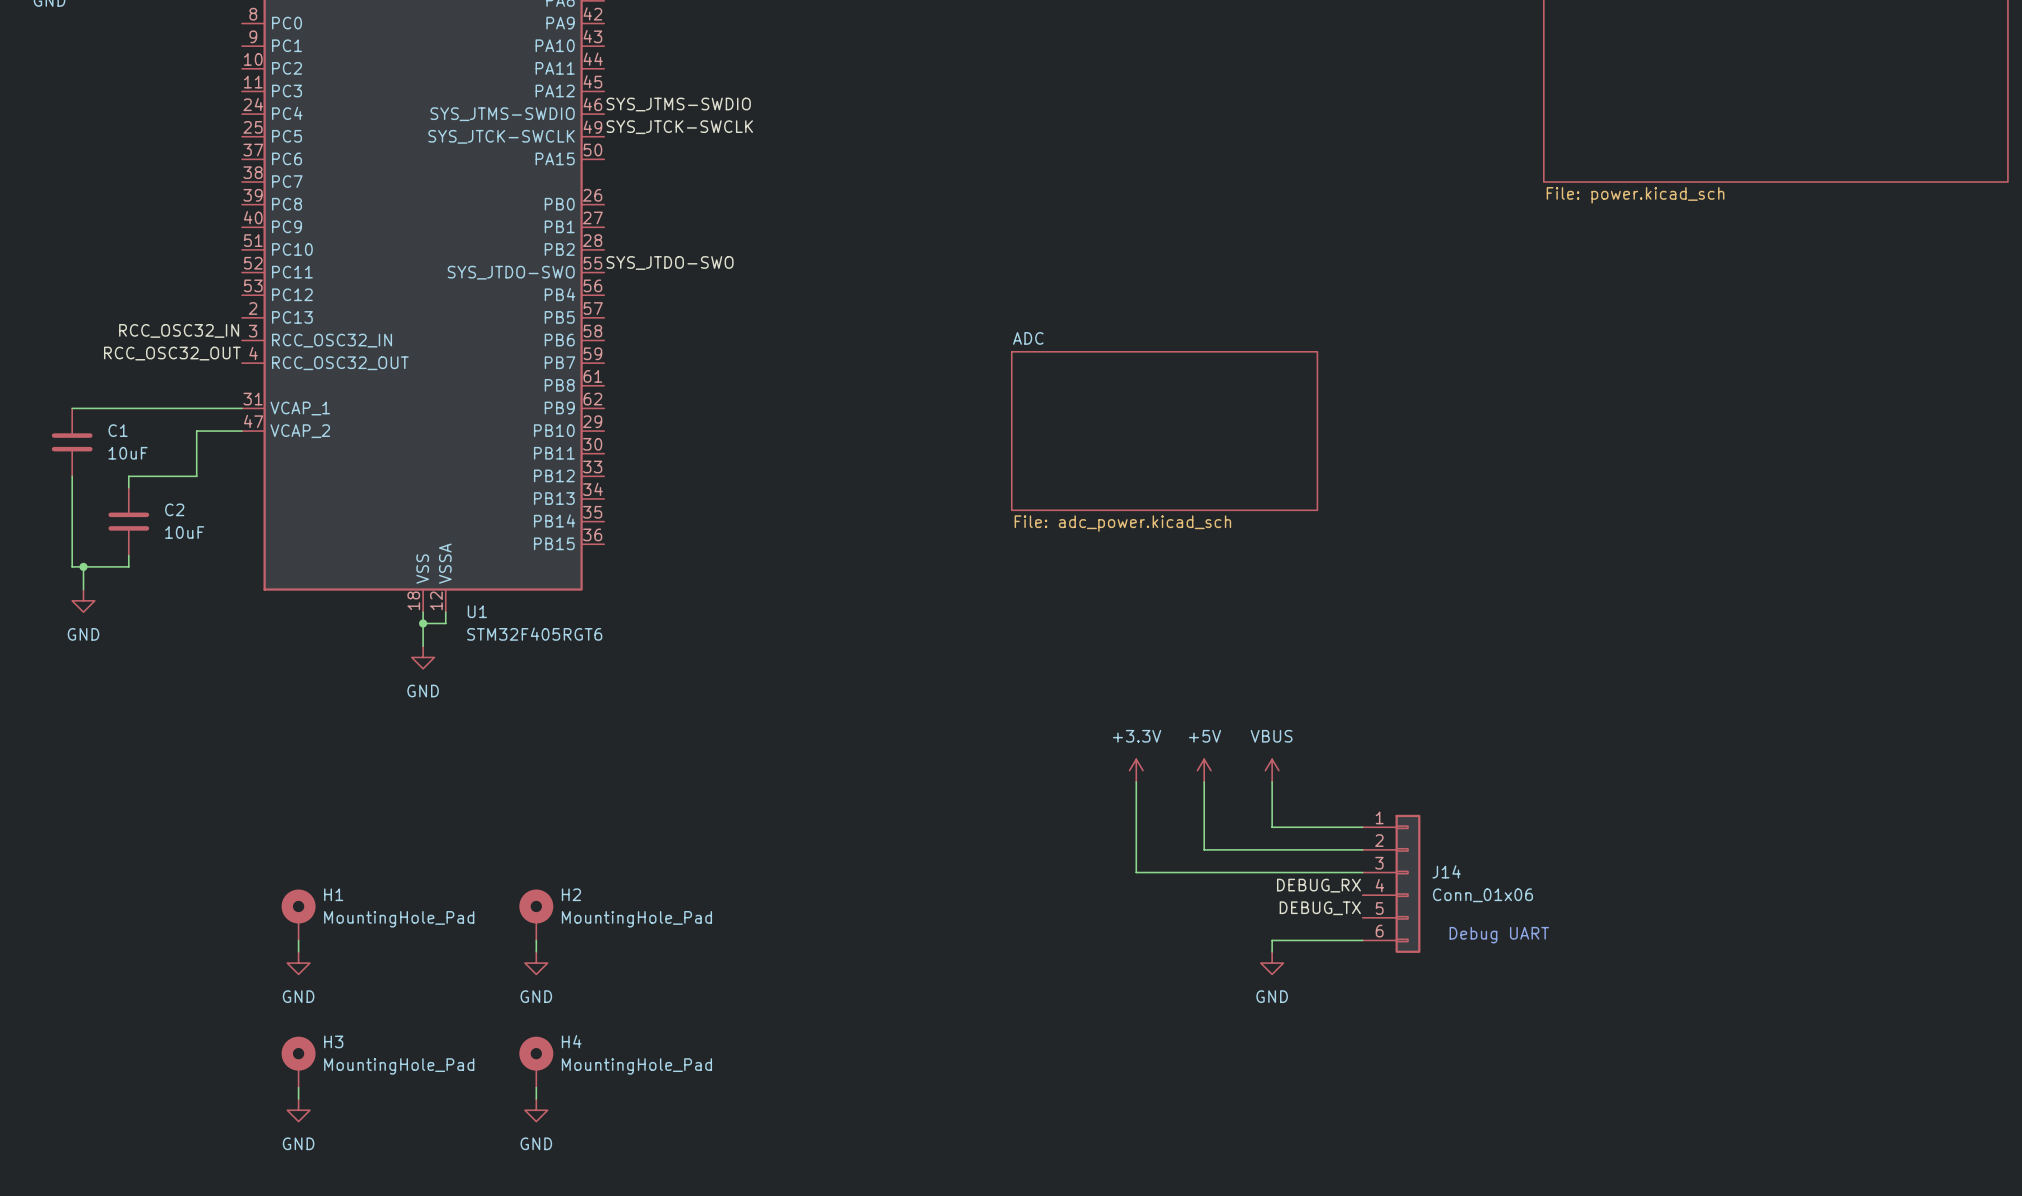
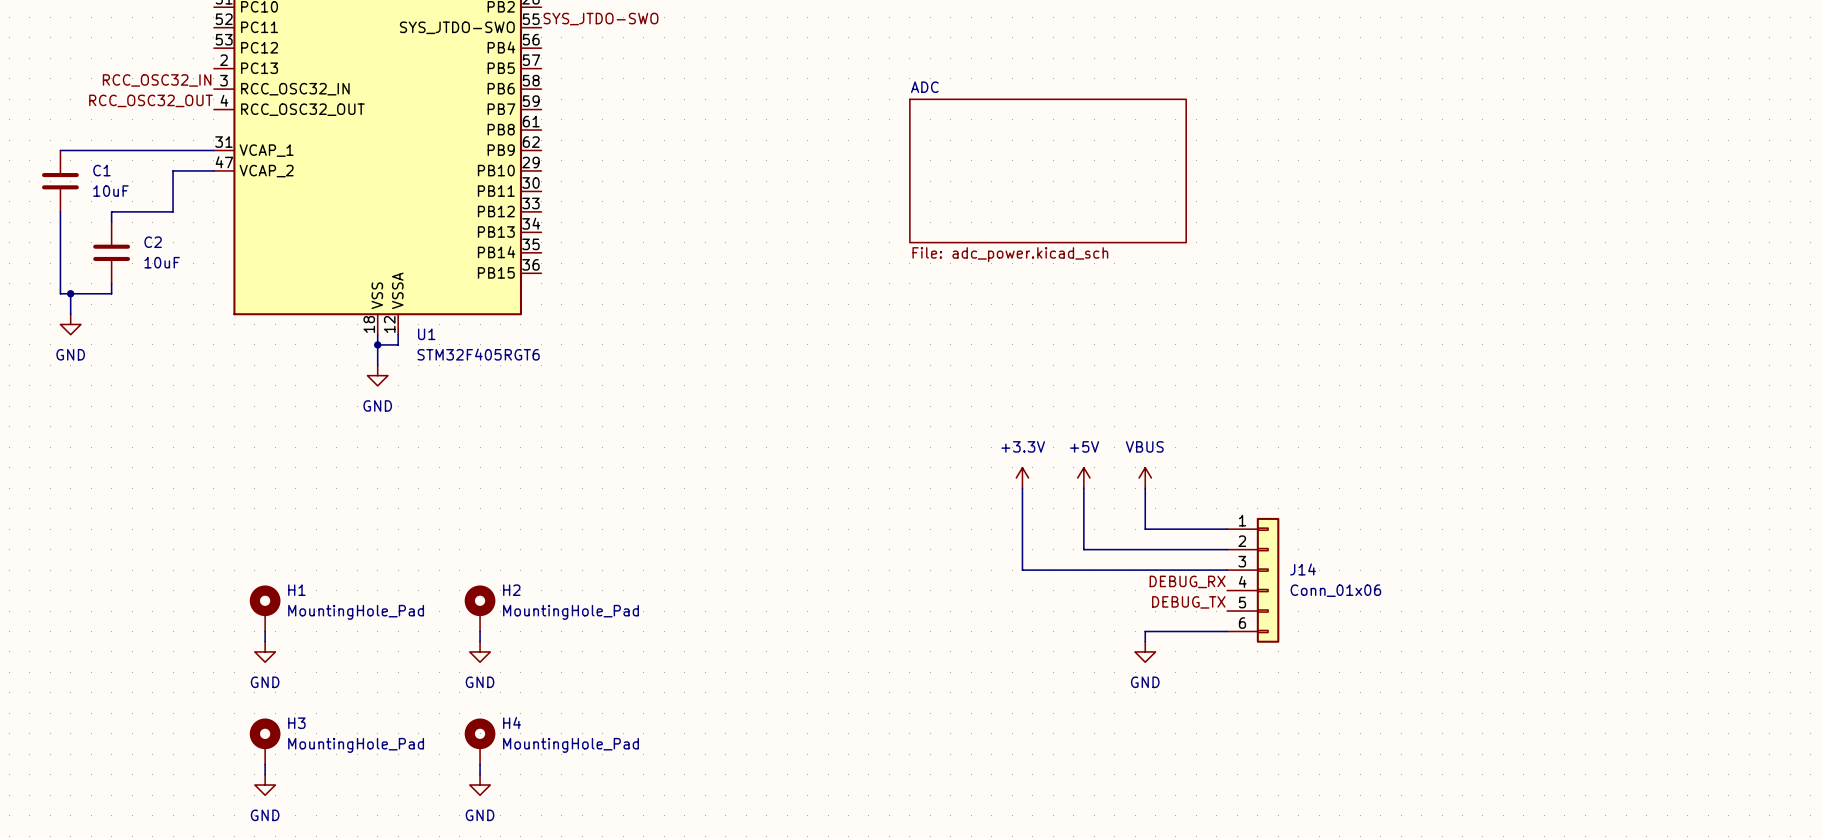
text: Debug UART (1499, 935) -> none

